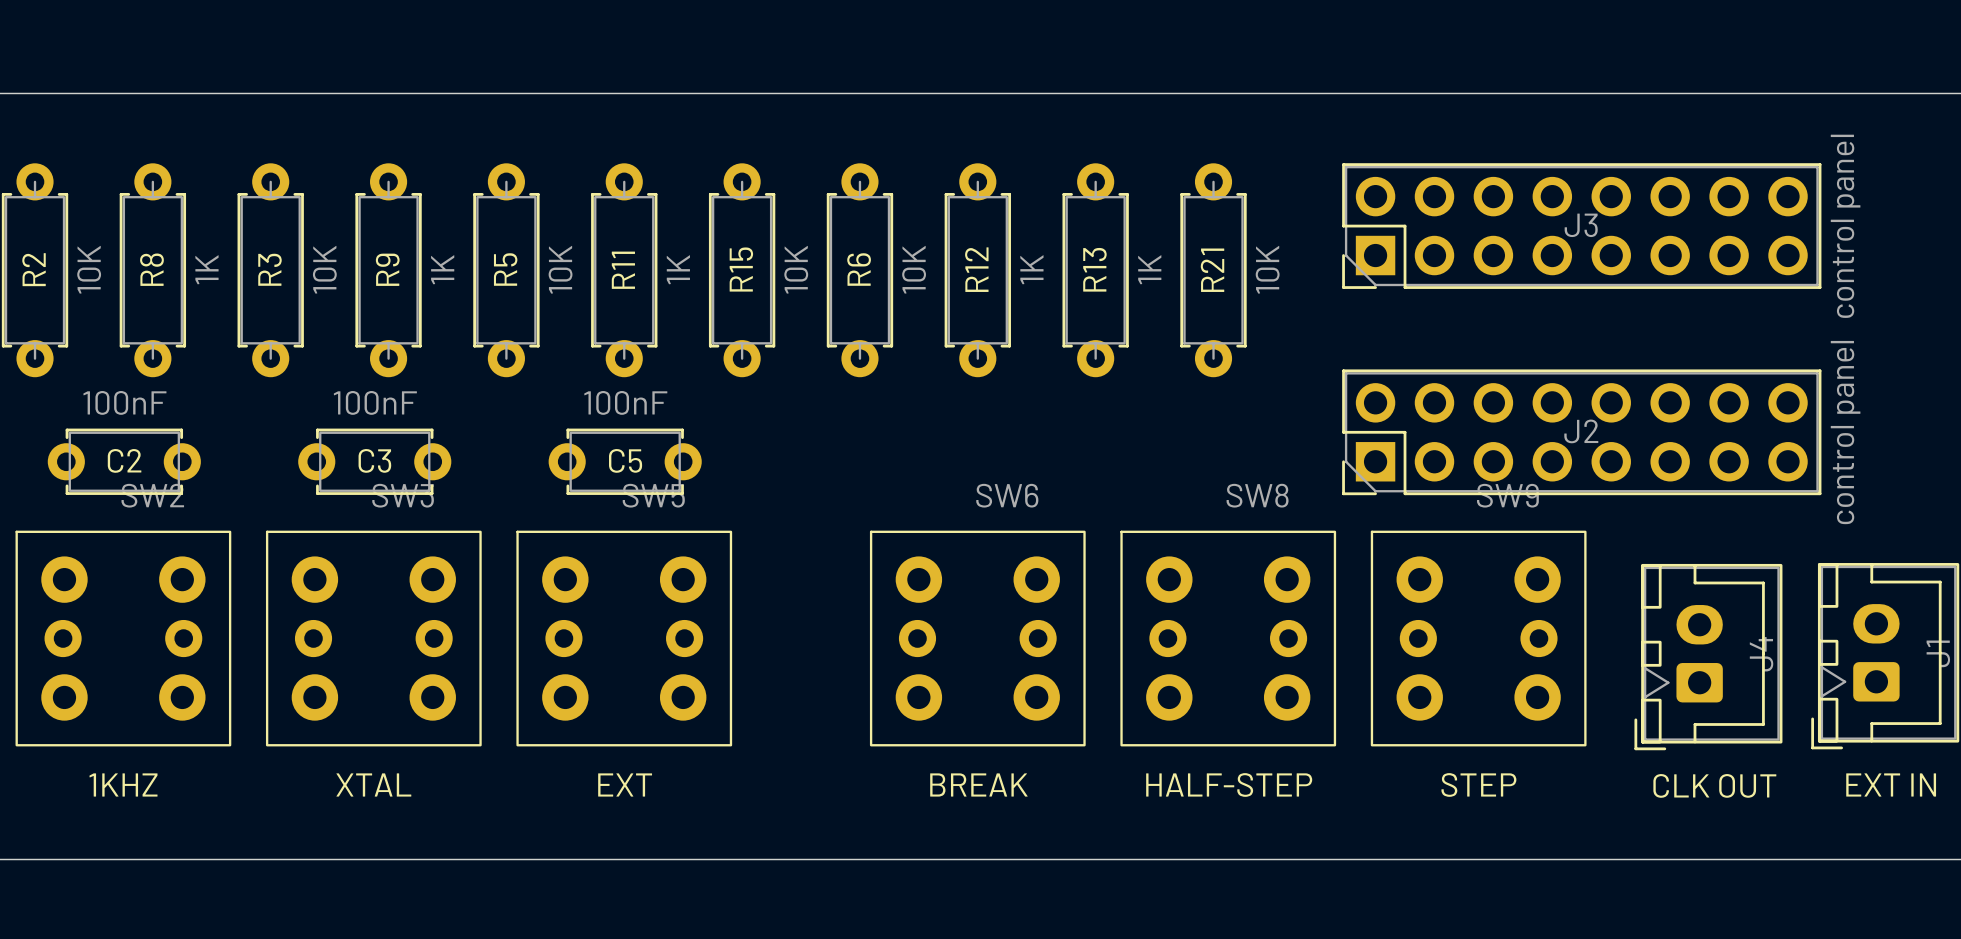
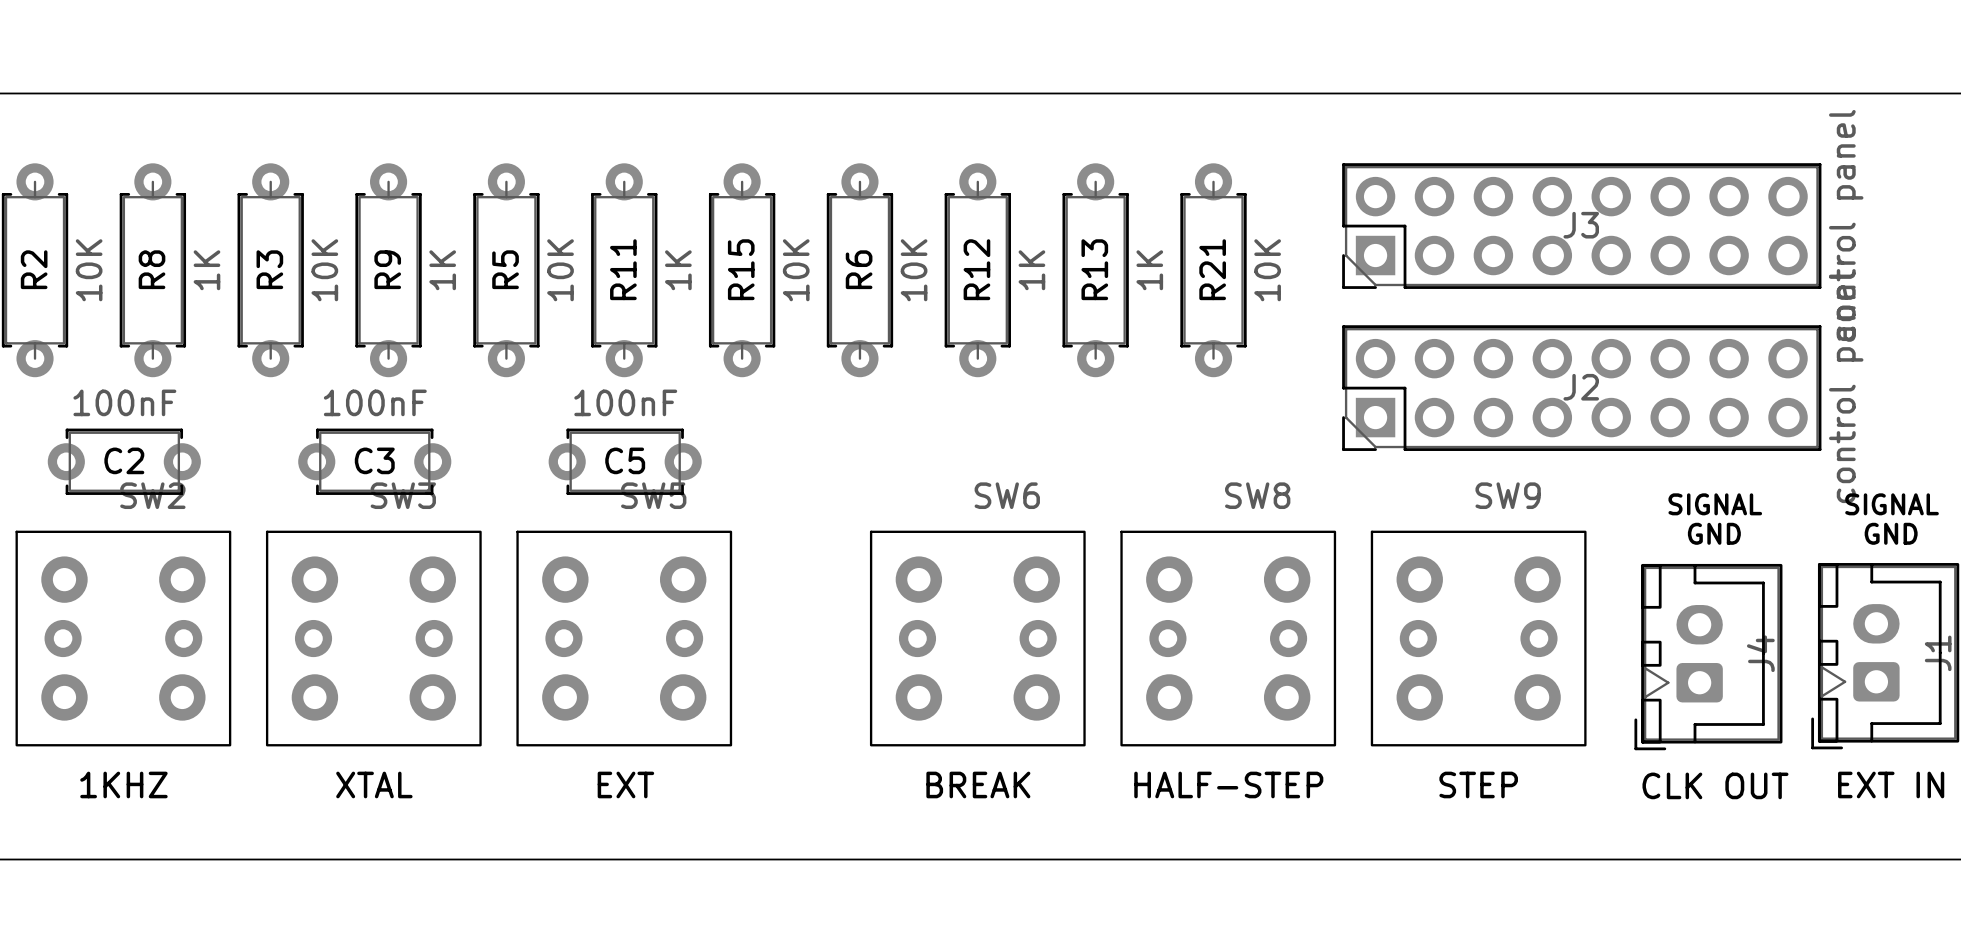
J2 position: (1581, 432) -> (1581, 388)
text: none -> SIGNAL (1715, 504)
text: none -> SIGNAL (1892, 504)
text: none -> GND (1714, 533)
text: none -> GND (1891, 533)

